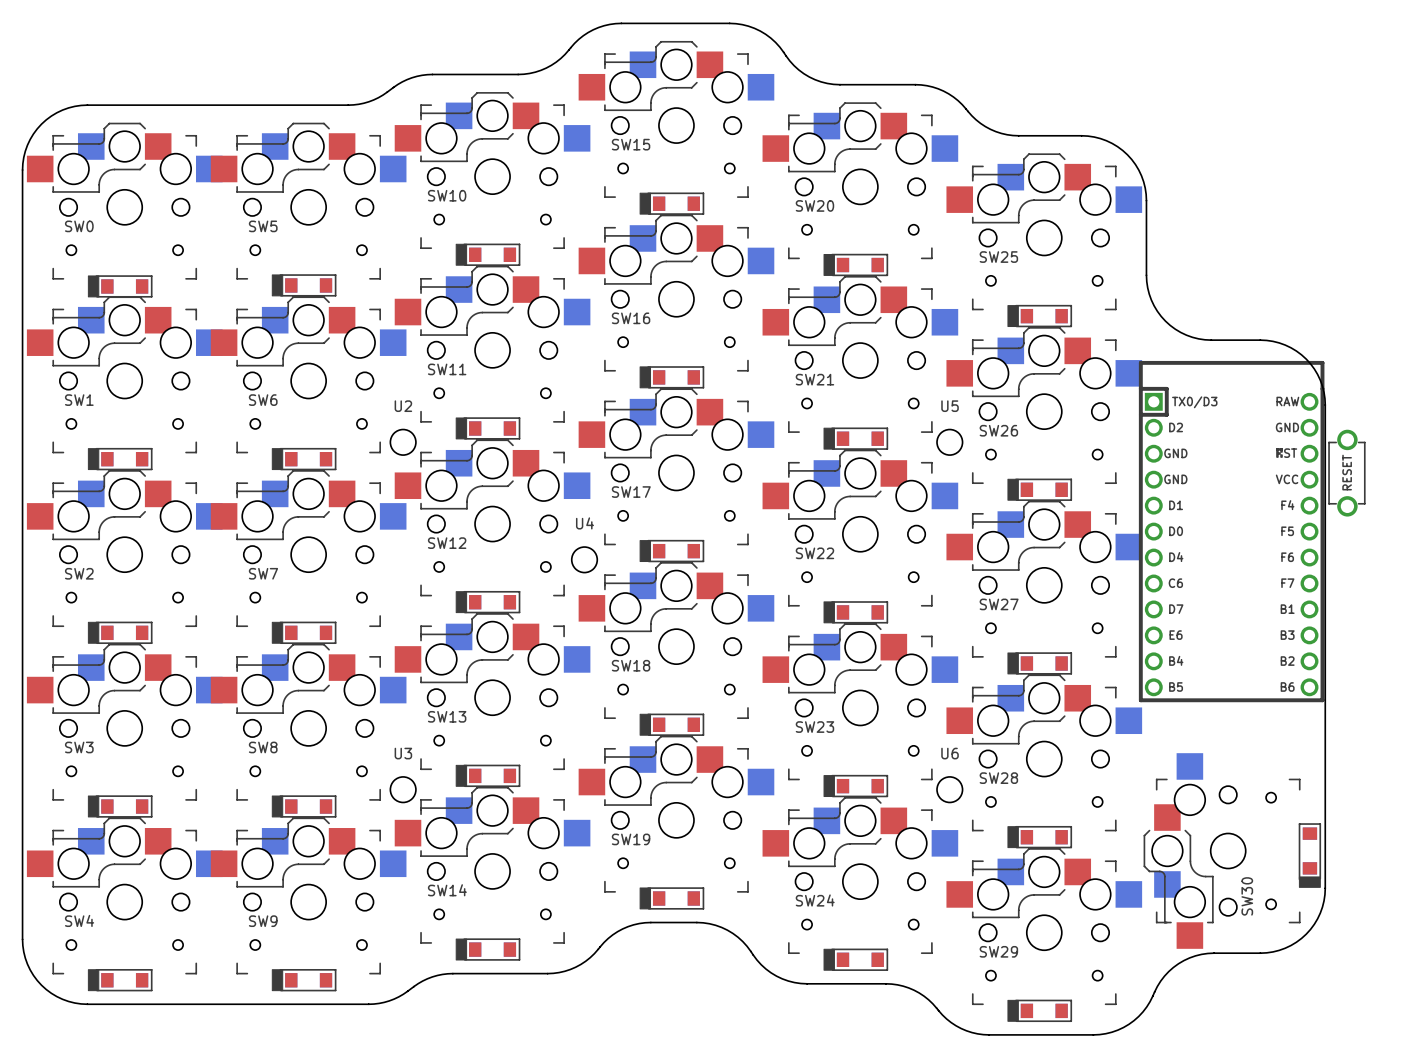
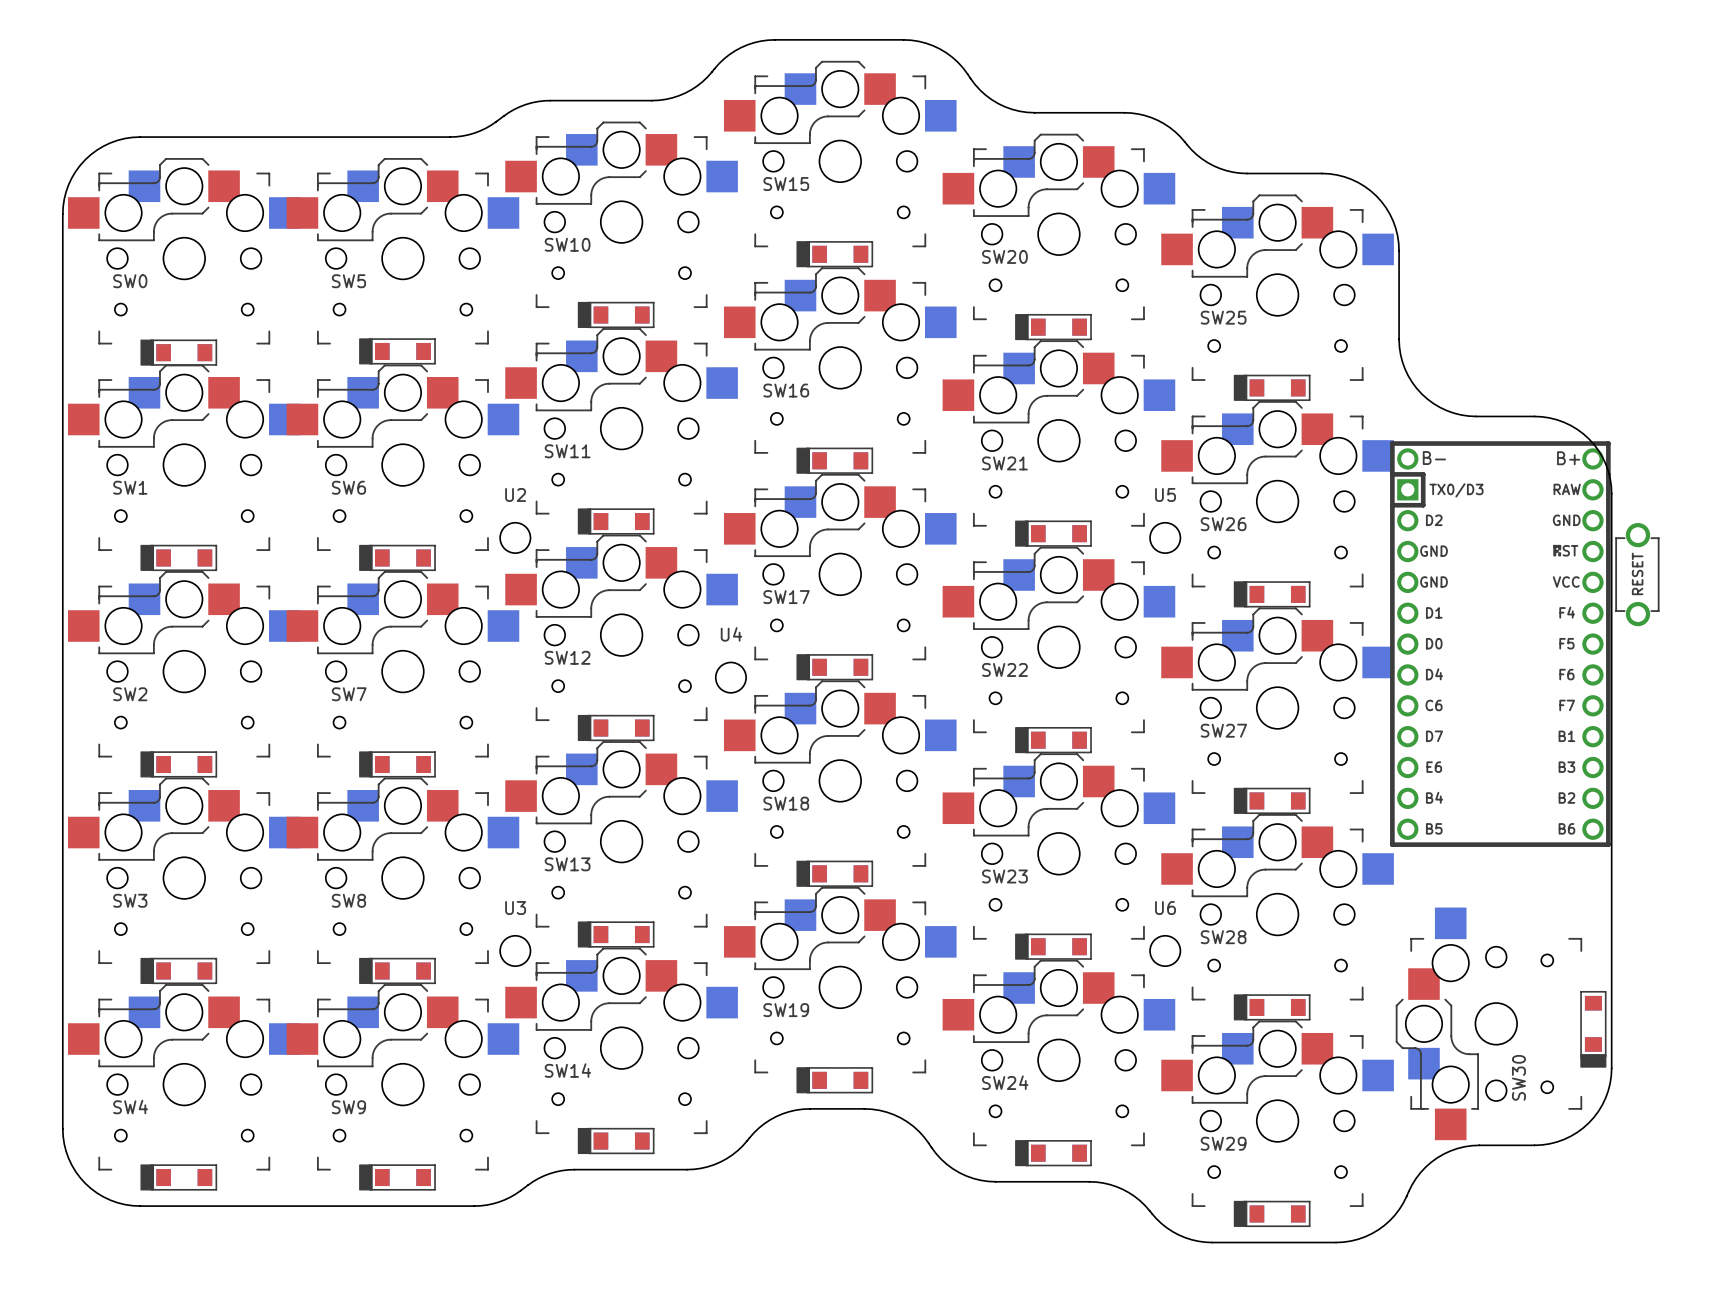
part footprint: [1138, 360, 1325, 703] -> [1390, 441, 1611, 847]

